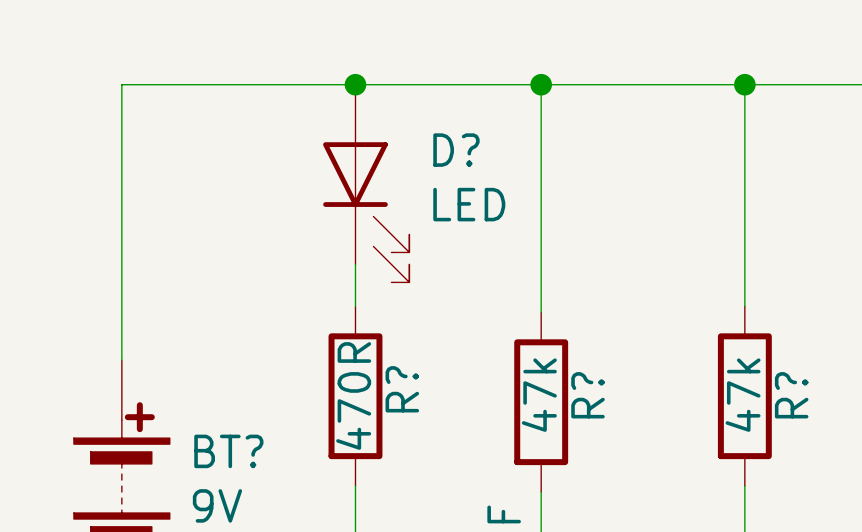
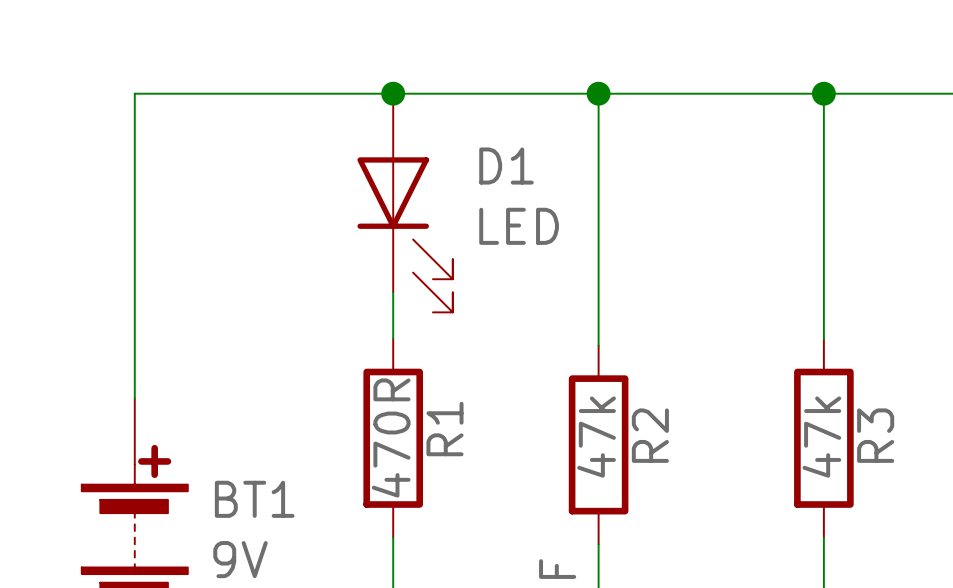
D? name: D? (456, 150) -> D1 (506, 166)
R? name: R? (402, 389) -> R1 (444, 429)
R? name: R? (587, 395) -> R2 (650, 435)
R? name: R? (791, 395) -> R3 (875, 435)
BT? name: BT? (228, 451) -> BT1 (254, 499)

